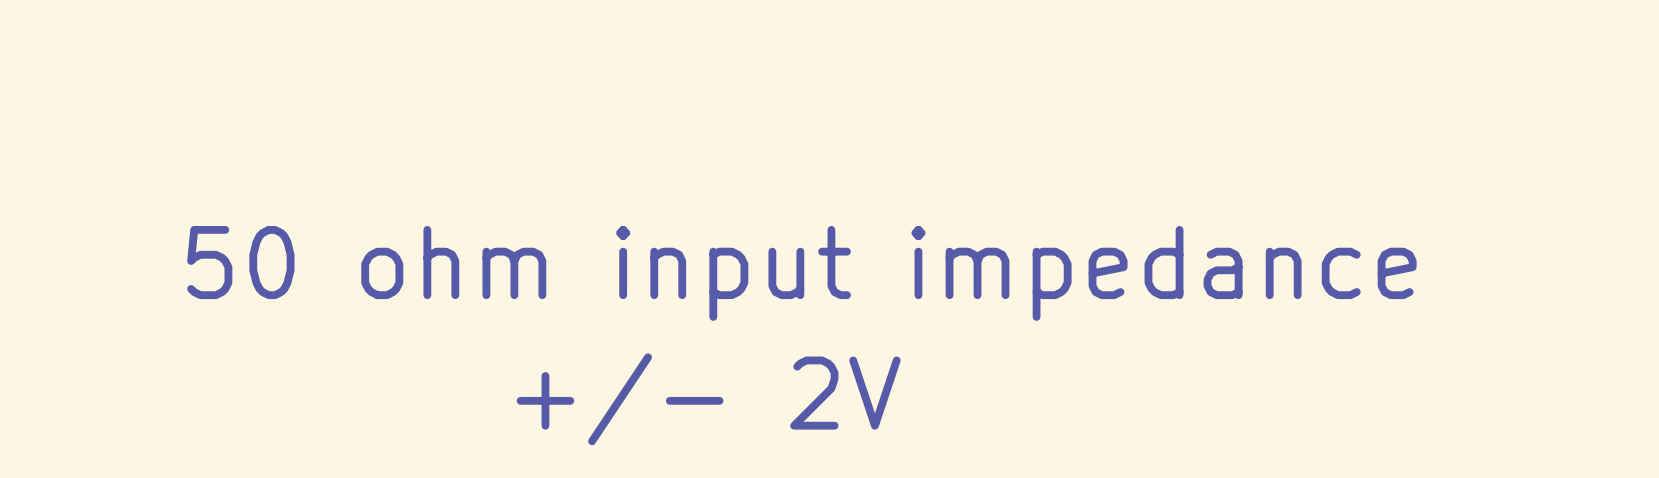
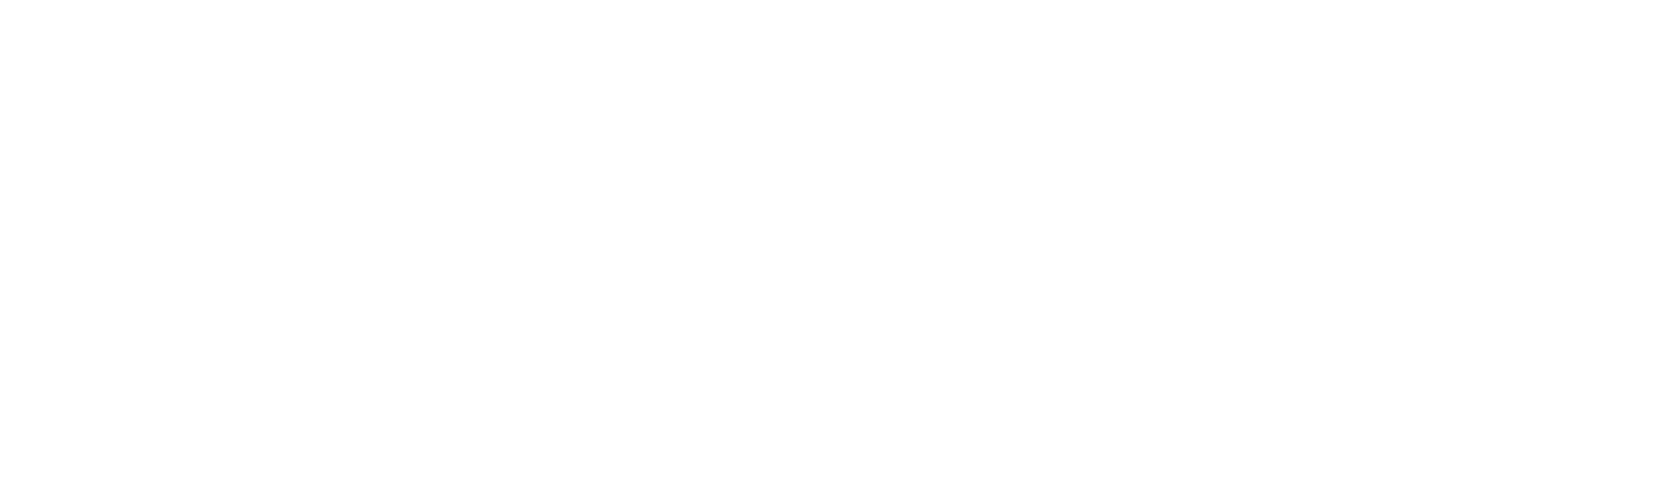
text: 50 ohm input impedance (801, 273) -> none
text: +/- 2V (708, 399) -> none

